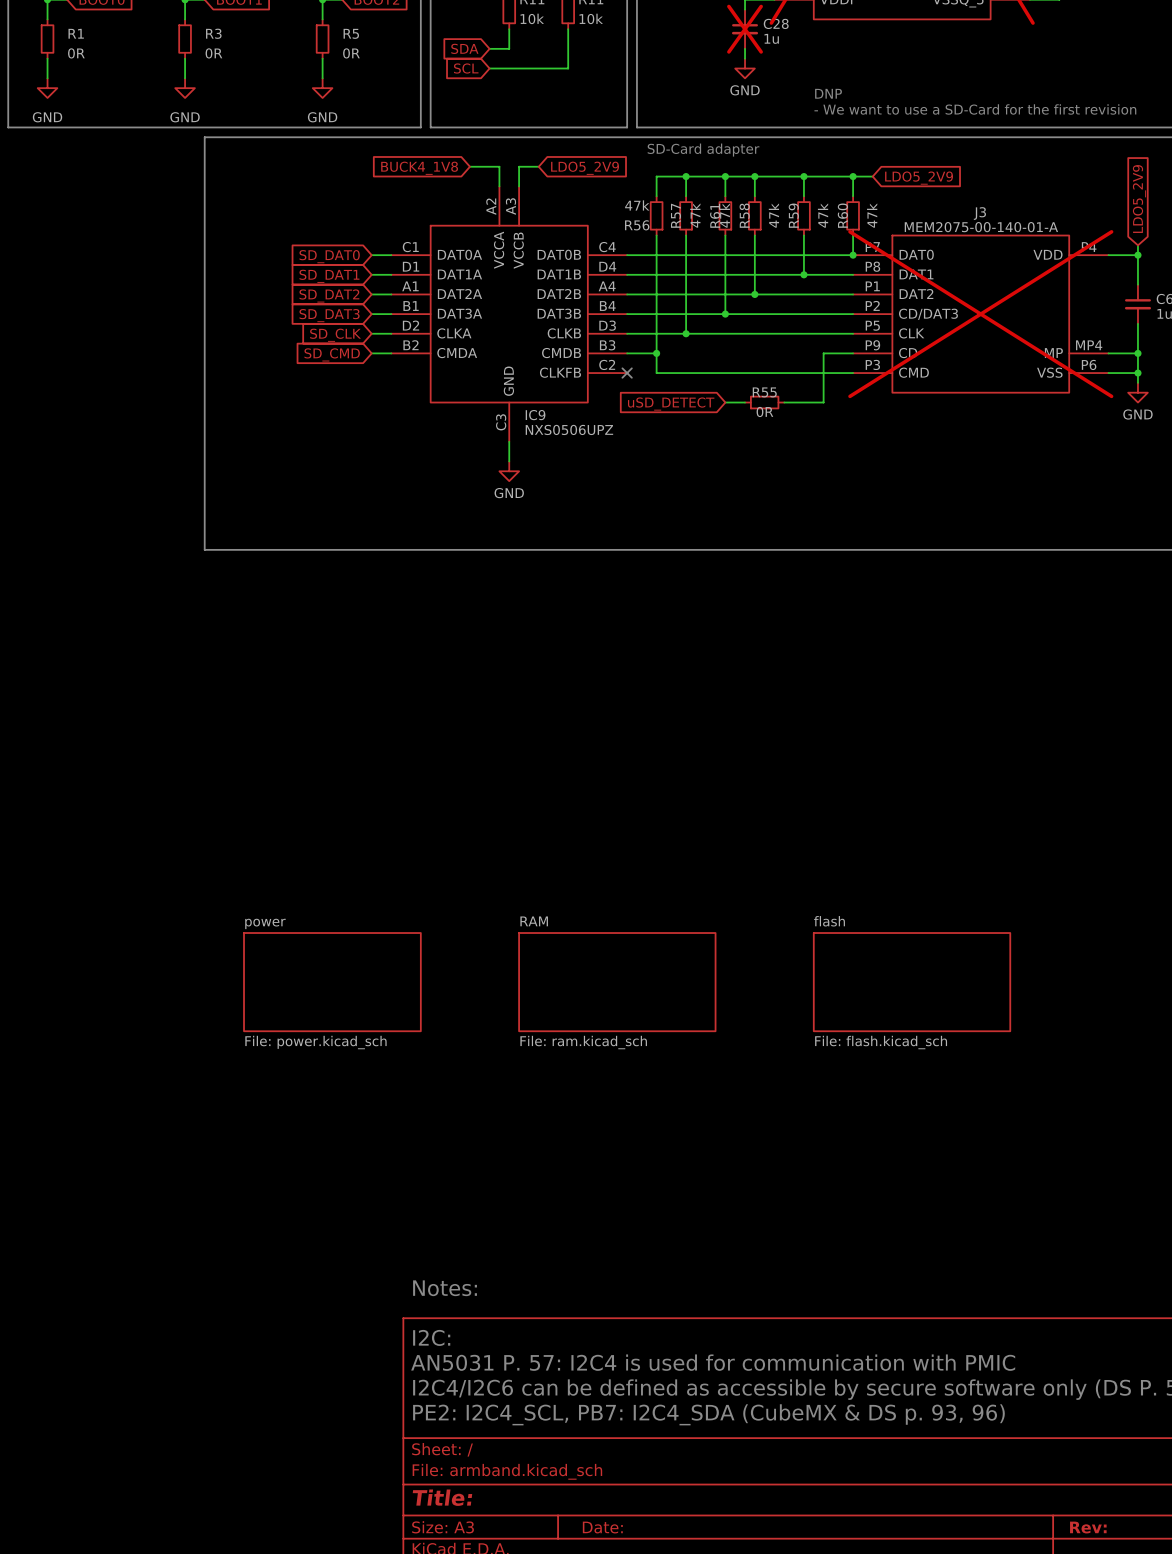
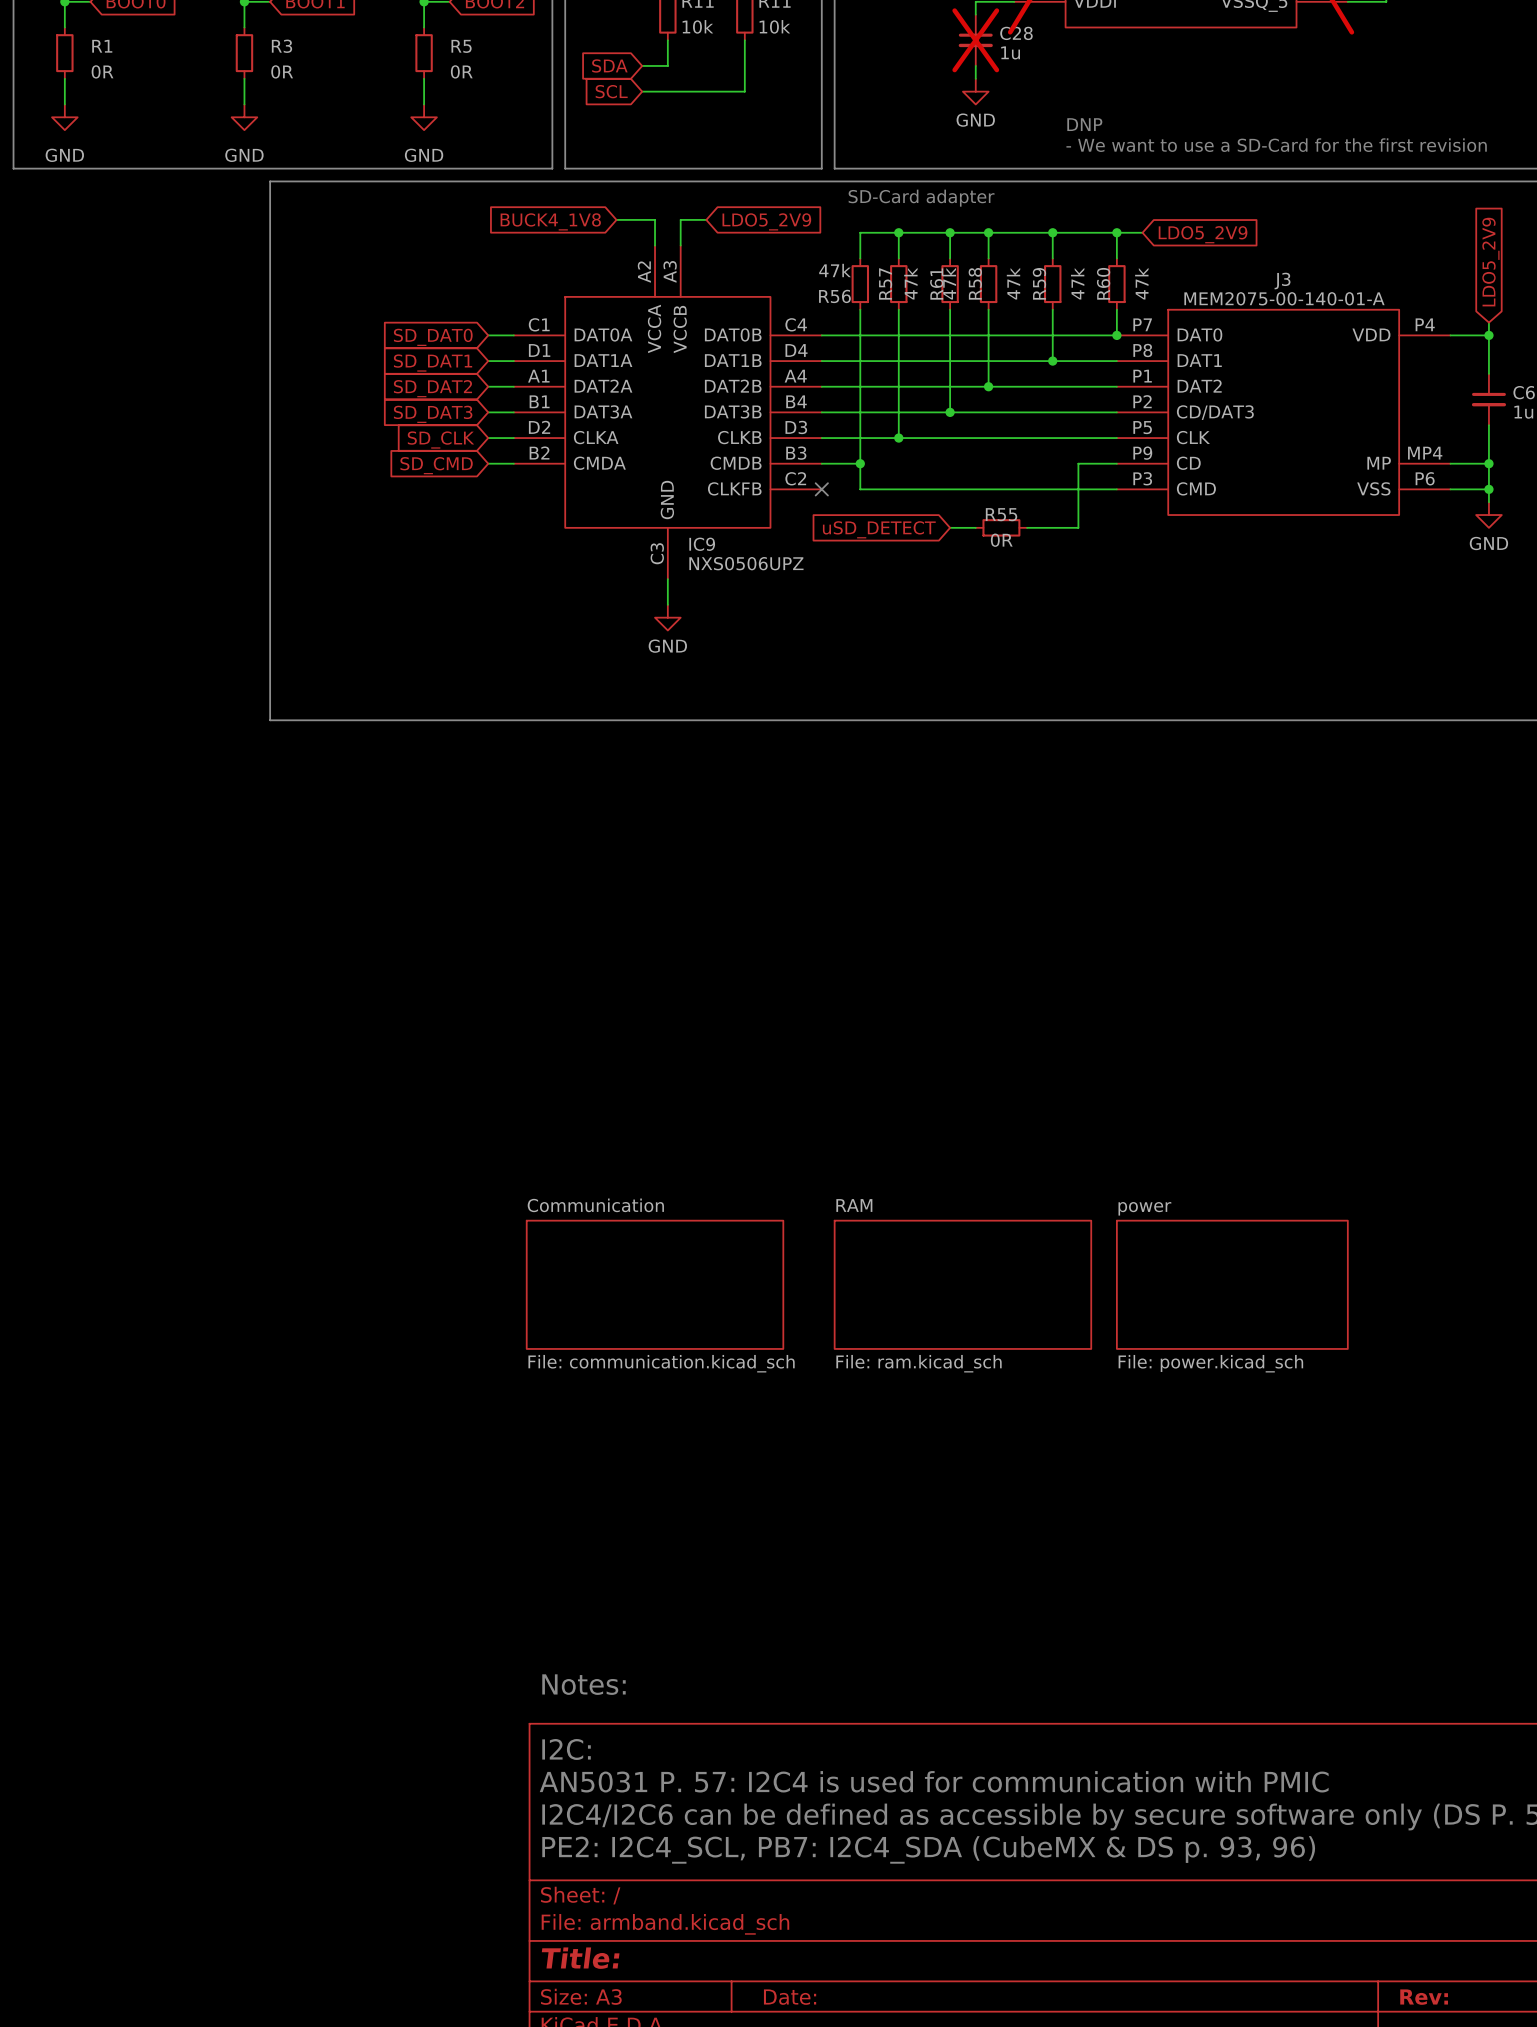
J3 do-not-place cross: (980, 314) -> none
sheet power: File: power.kicad_sch (332, 982) -> none
sheet Communication: none -> File: communication.kicad_sch (655, 1284)
sheet RAM position: (617, 982) -> (962, 1284)
sheet flash: File: flash.kicad_sch (912, 982) -> none
sheet power: none -> File: power.kicad_sch (1232, 1284)

